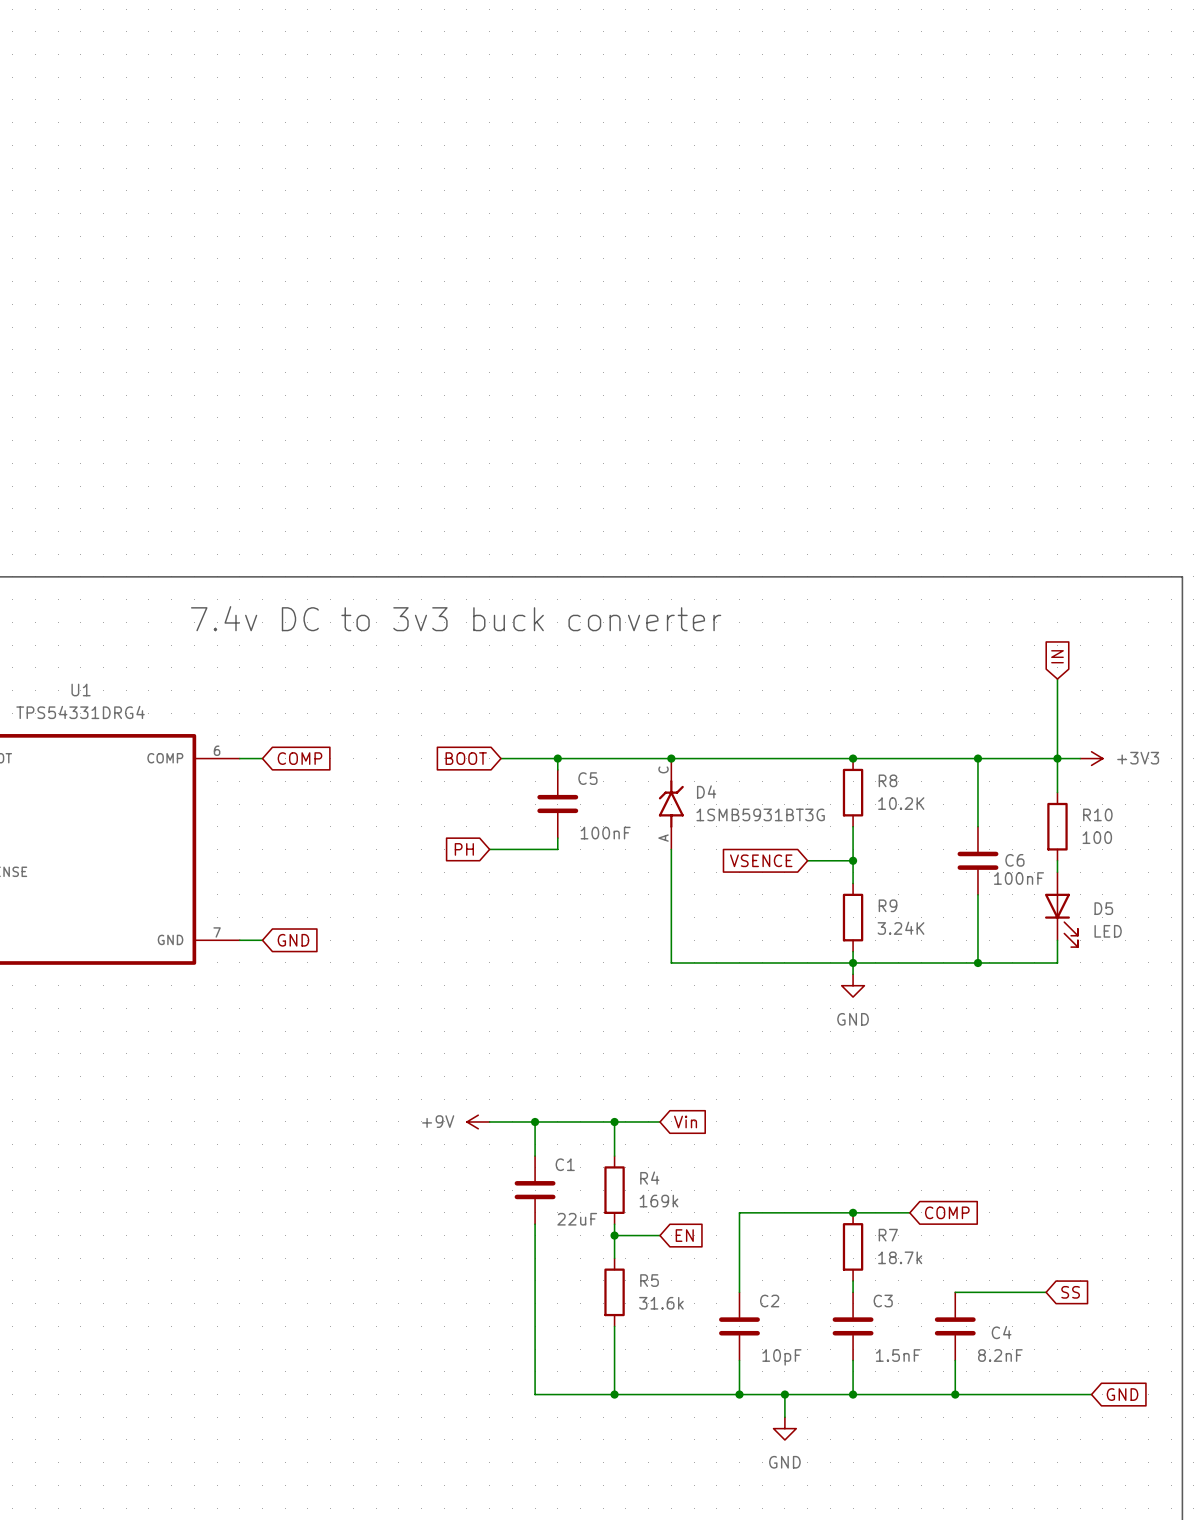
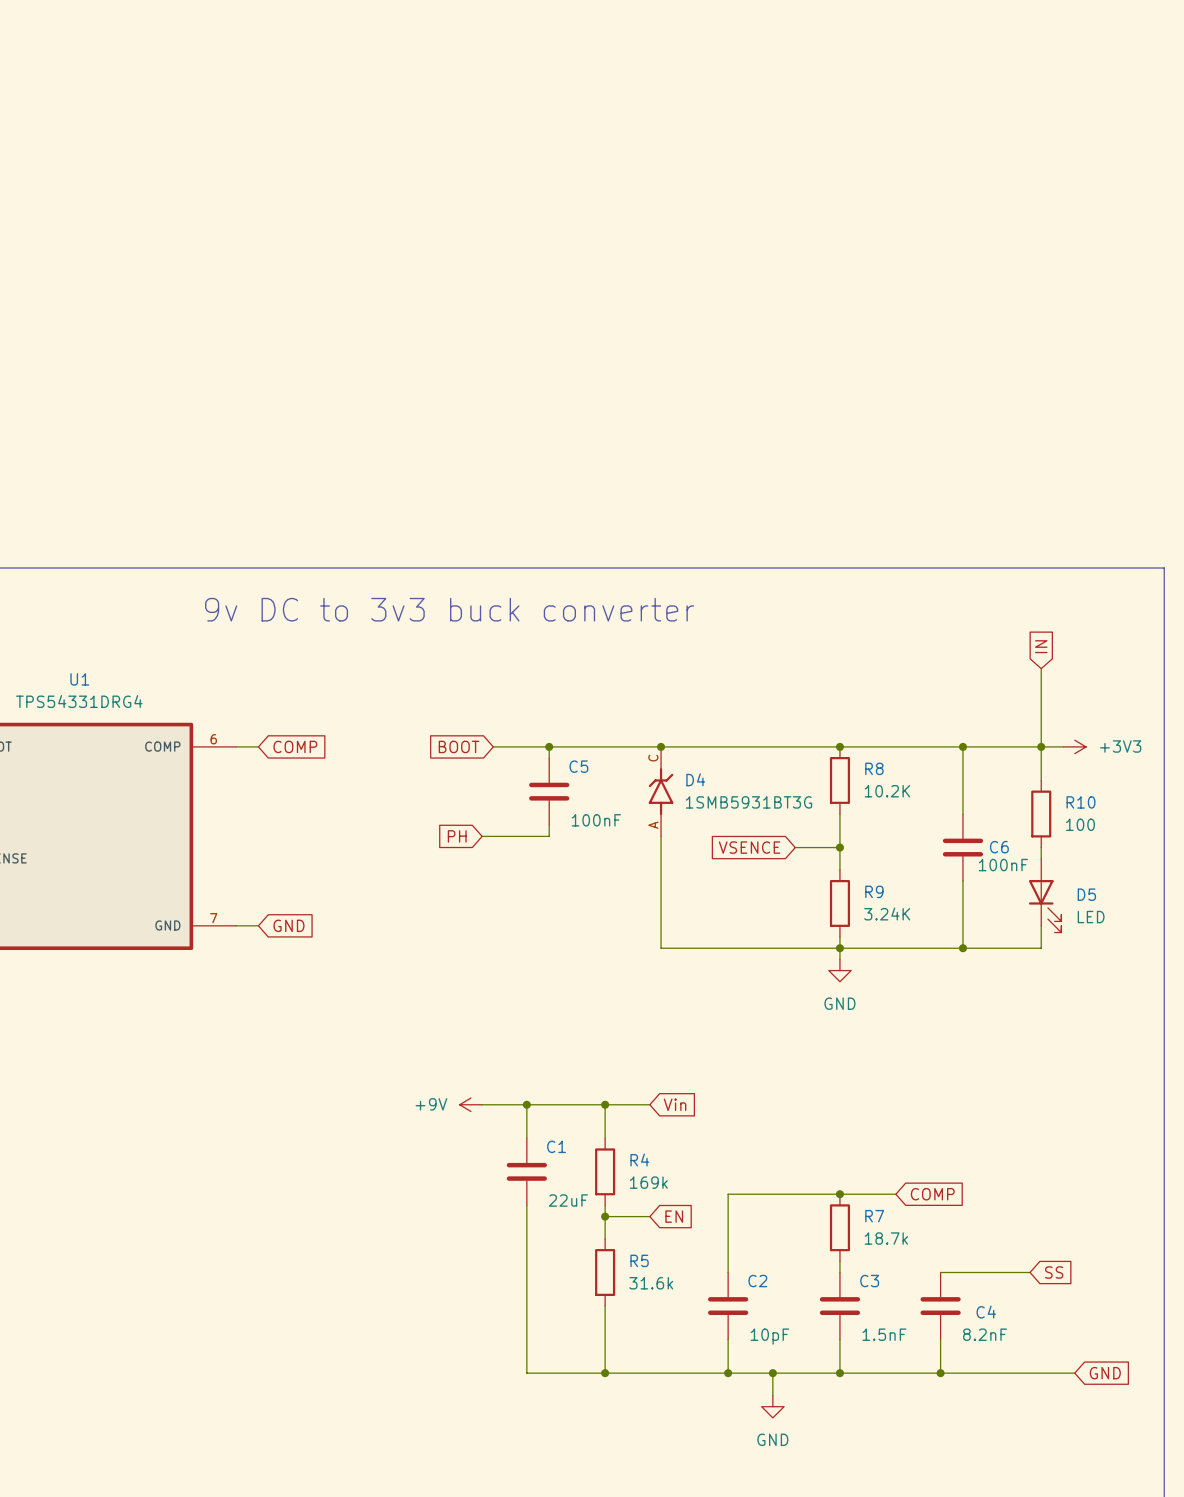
text: 7.4v DC to 3v3 buck converter (456, 618) -> 9v DC to 3v3 buck converter (449, 609)

